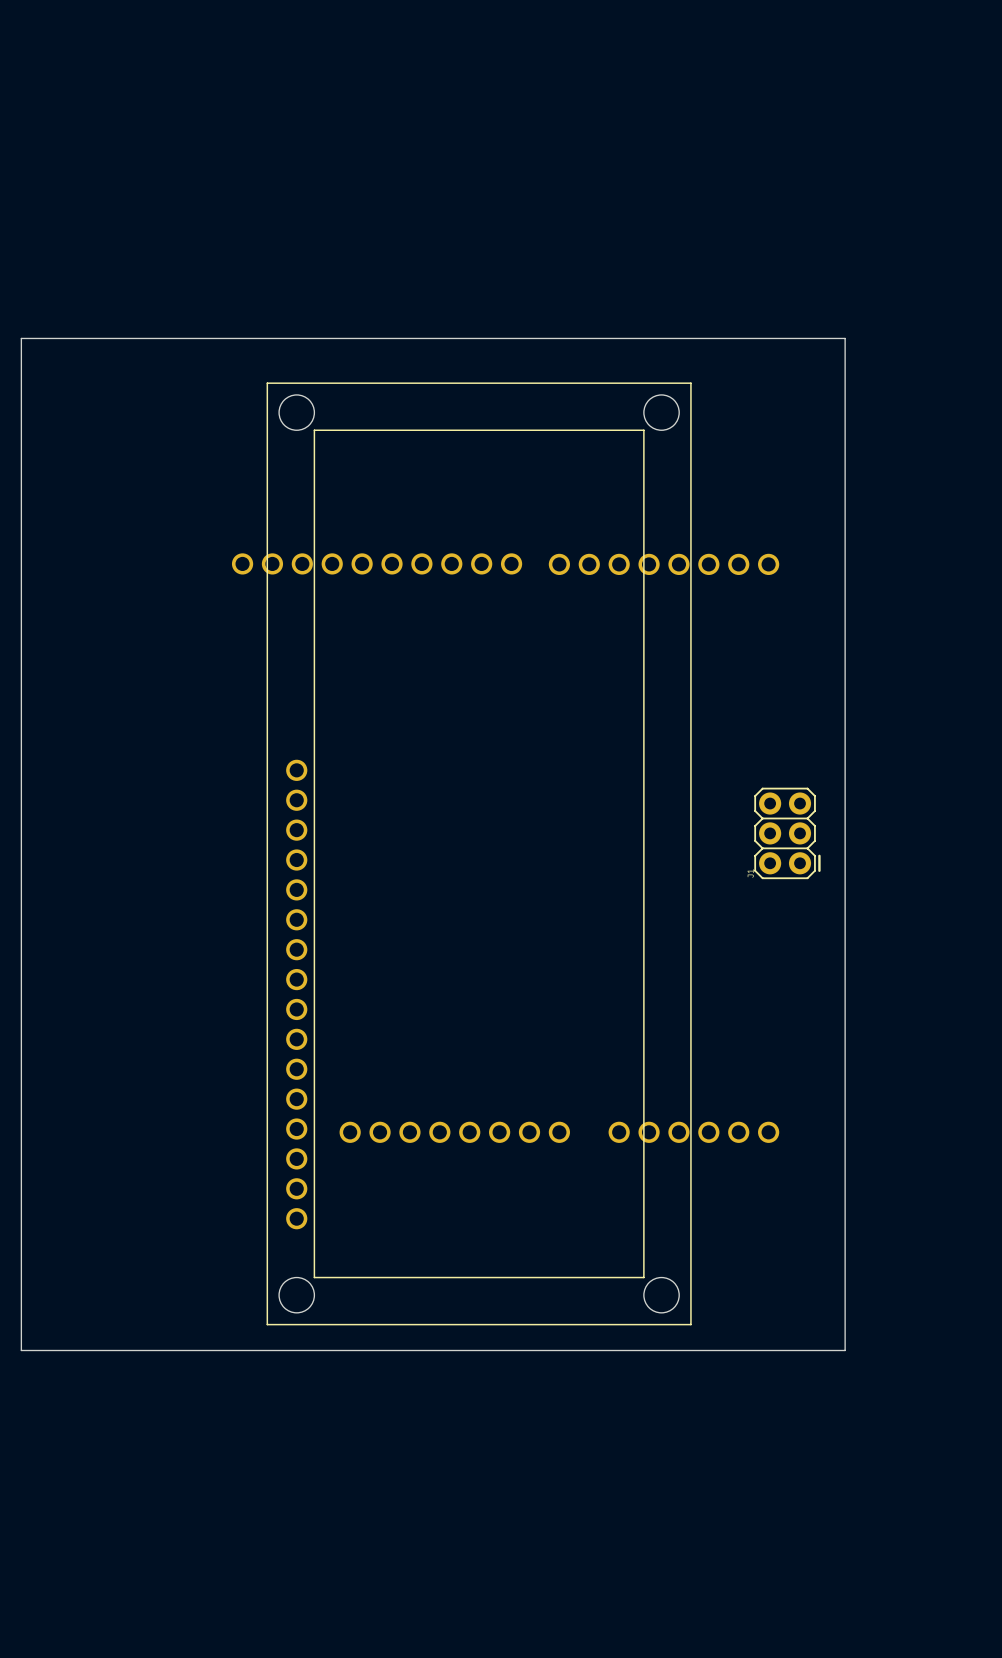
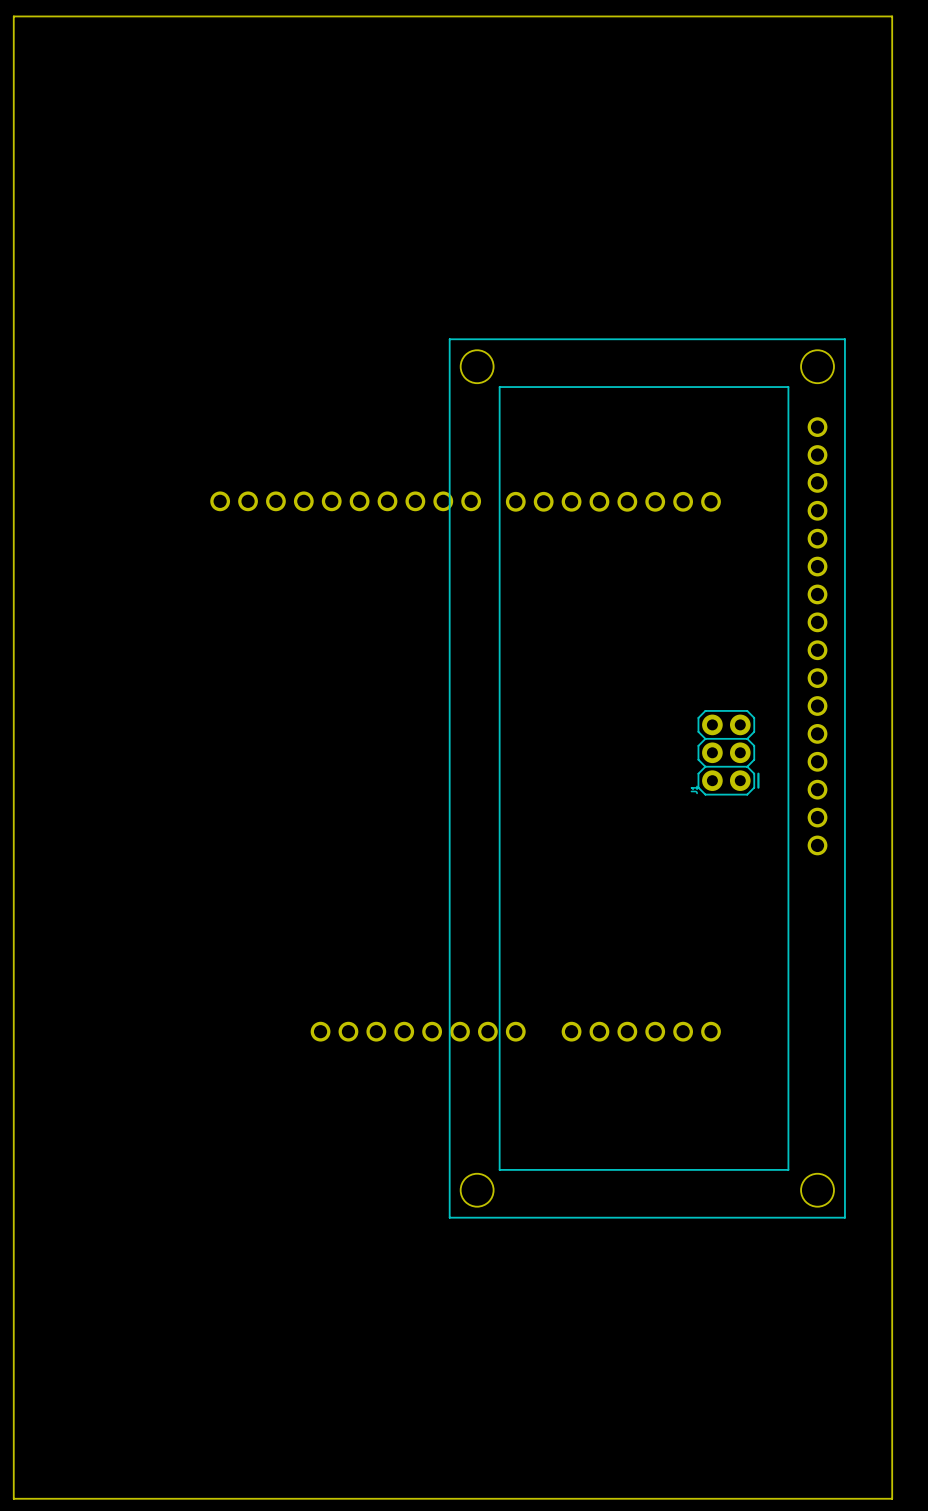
board edge: (21, 338) (845, 338) (845, 1350) (21, 1350) -> (13, 290) (13, 16) (892, 16) (892, 1498) (13, 1498) (13, 1235)
part: (479, 853) -> none
part: none -> (647, 778)

